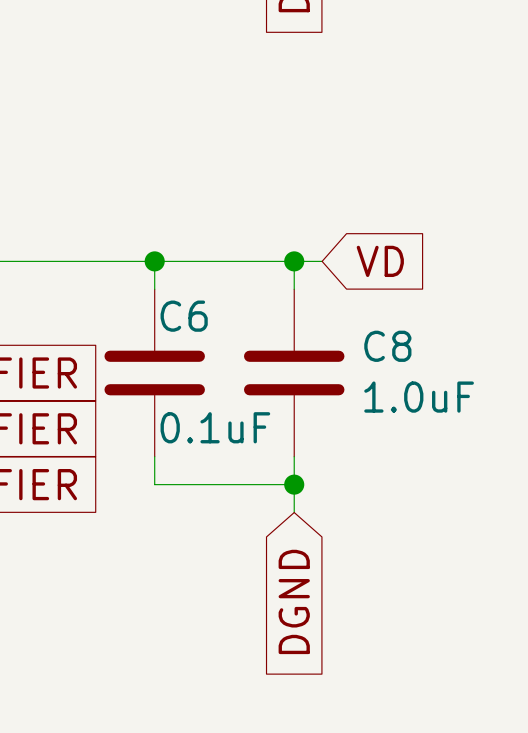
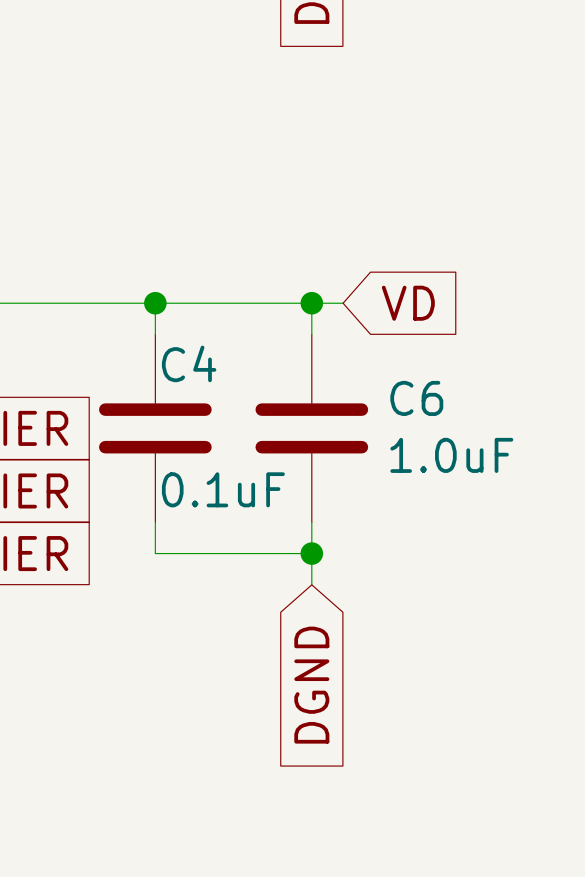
C6 name: C6 (184, 316) -> C4 (189, 363)
C8 name: C8 (387, 346) -> C6 (416, 398)

